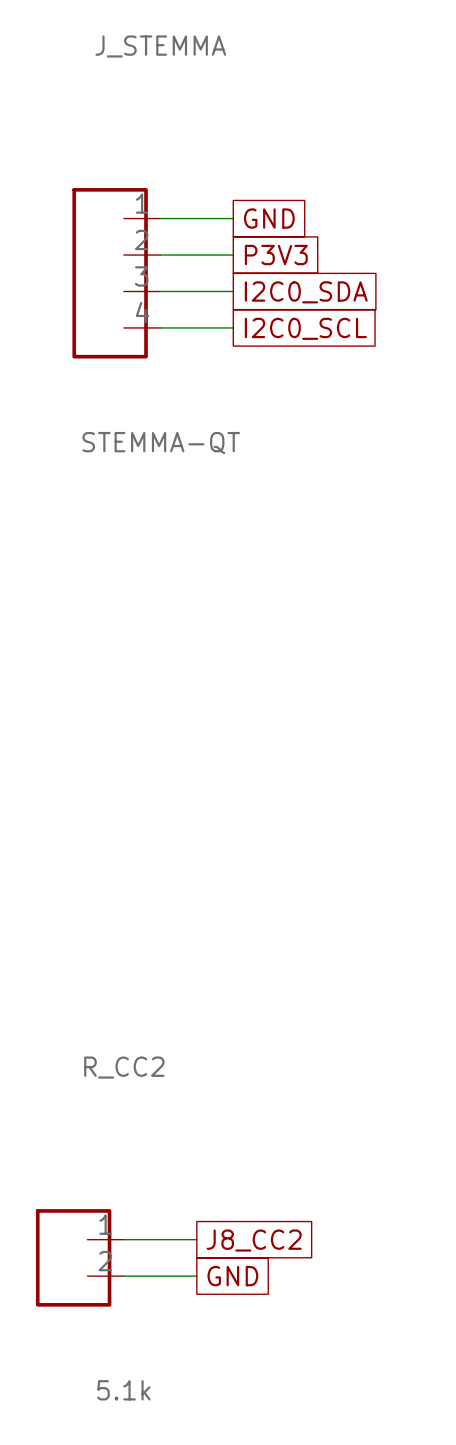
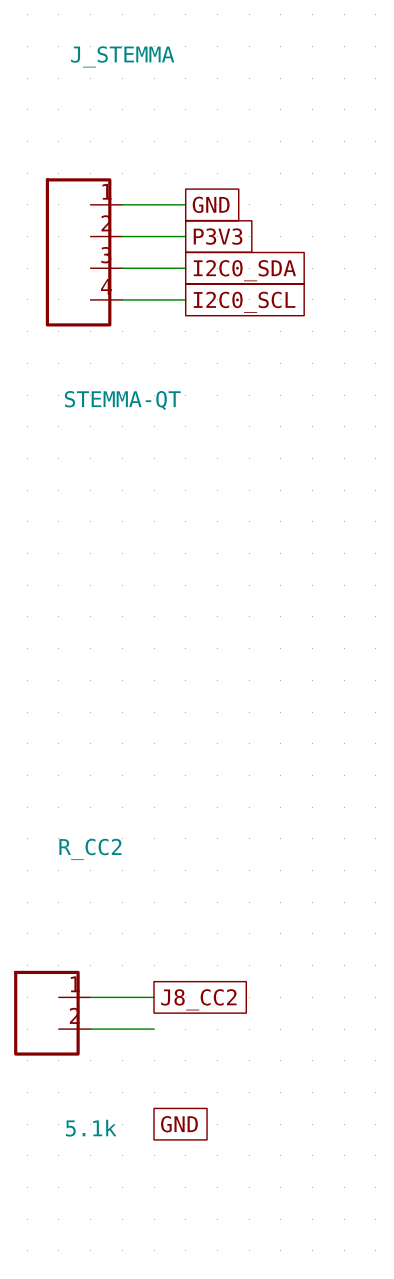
wire: (123, 1239) (196, 1239) -> (90, 997) (154, 997)
global label position: J8_CC2 (254, 1240) -> J8_CC2 (198, 999)
R_CC2 position: (79, 1257) -> (52, 1013)
wire: (123, 1276) (196, 1276) -> (90, 1029) (154, 1029)

